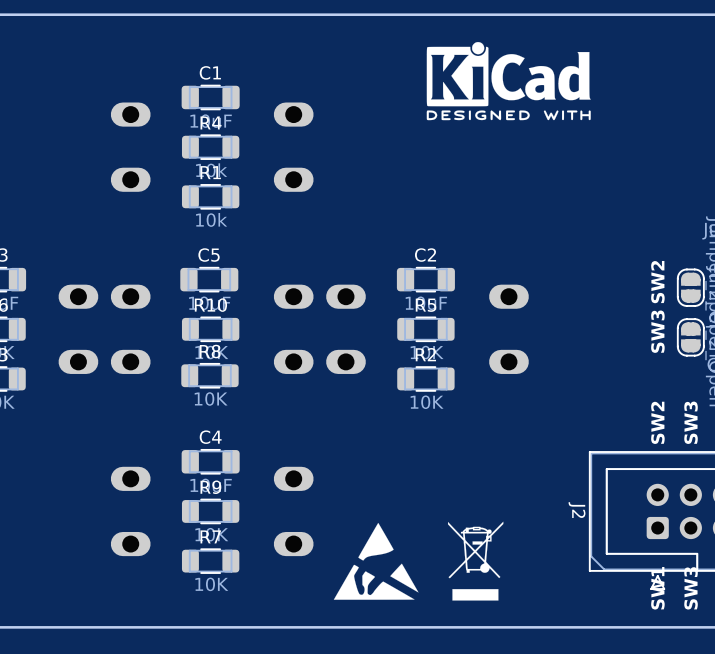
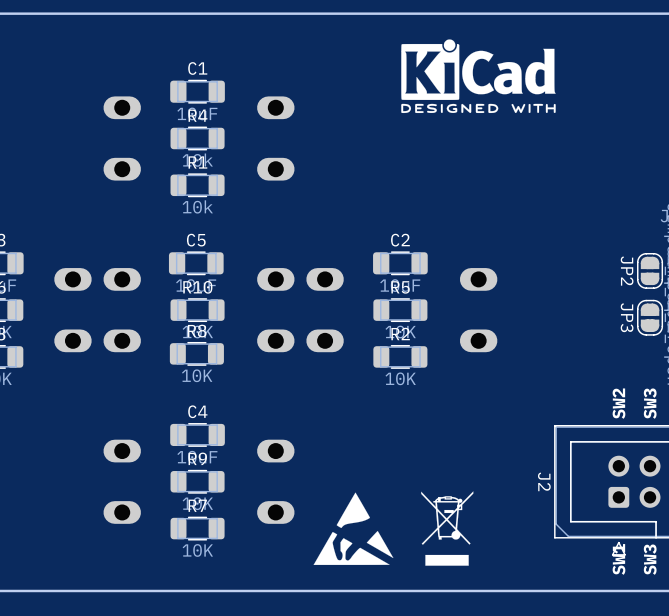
text: SW2 (657, 282) -> none
JP2 name: none -> JP2 (627, 271)
text: SW3 (657, 331) -> none
JP3 name: none -> JP3 (627, 317)

